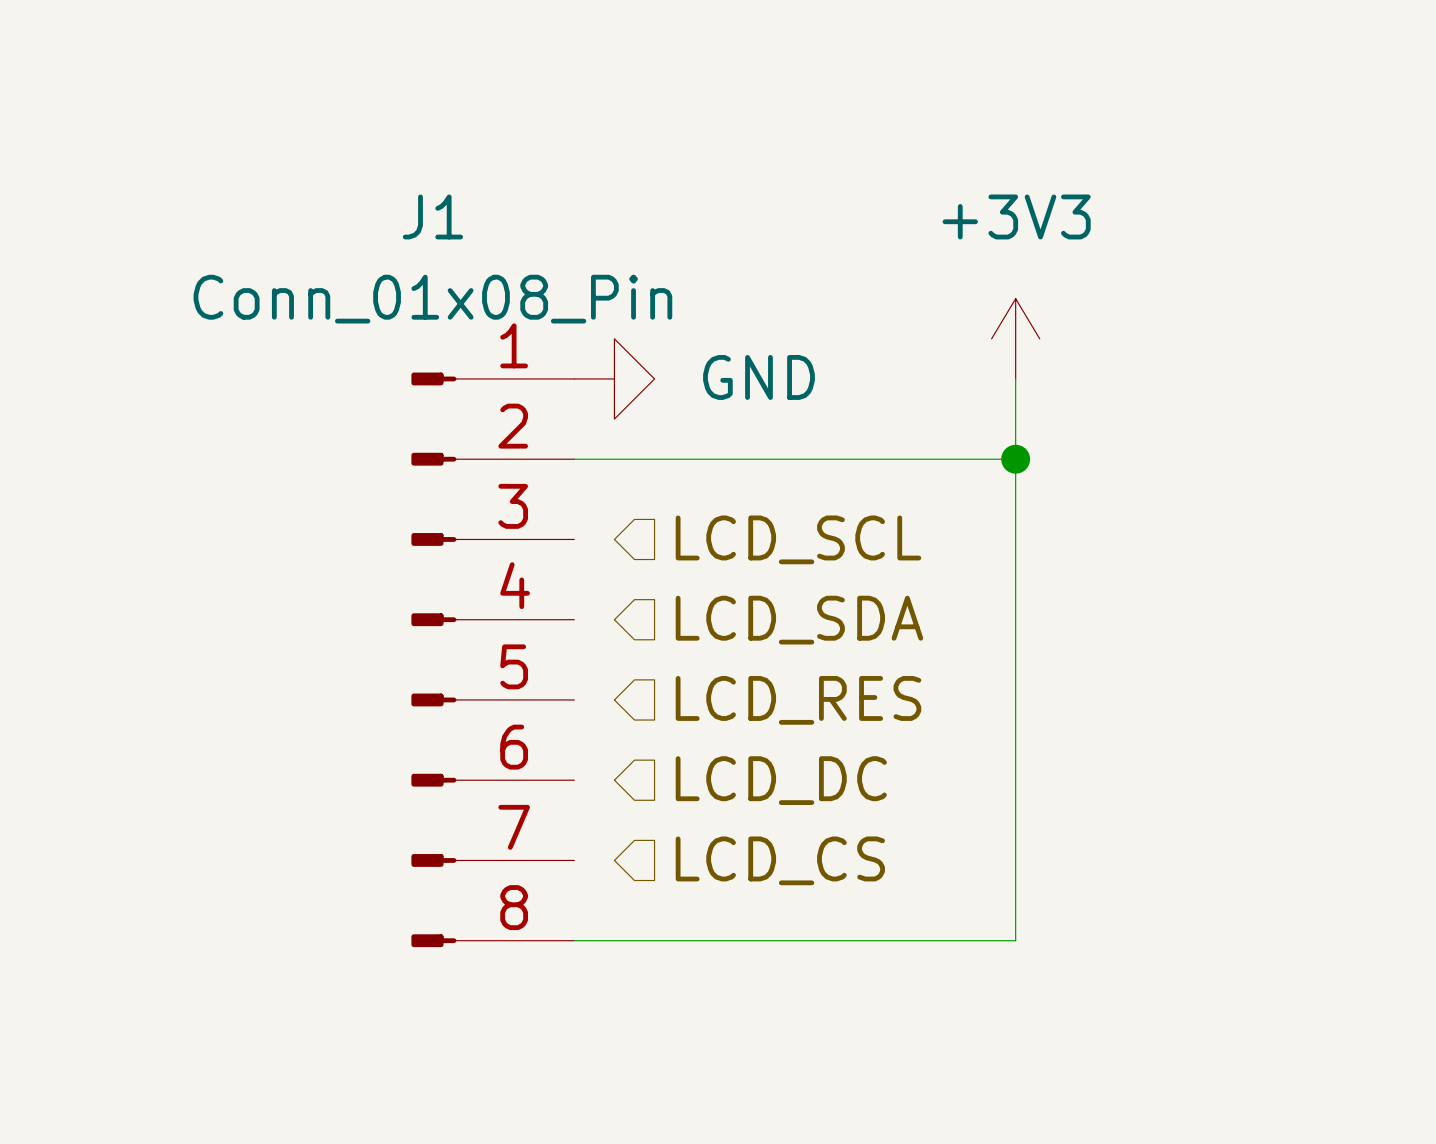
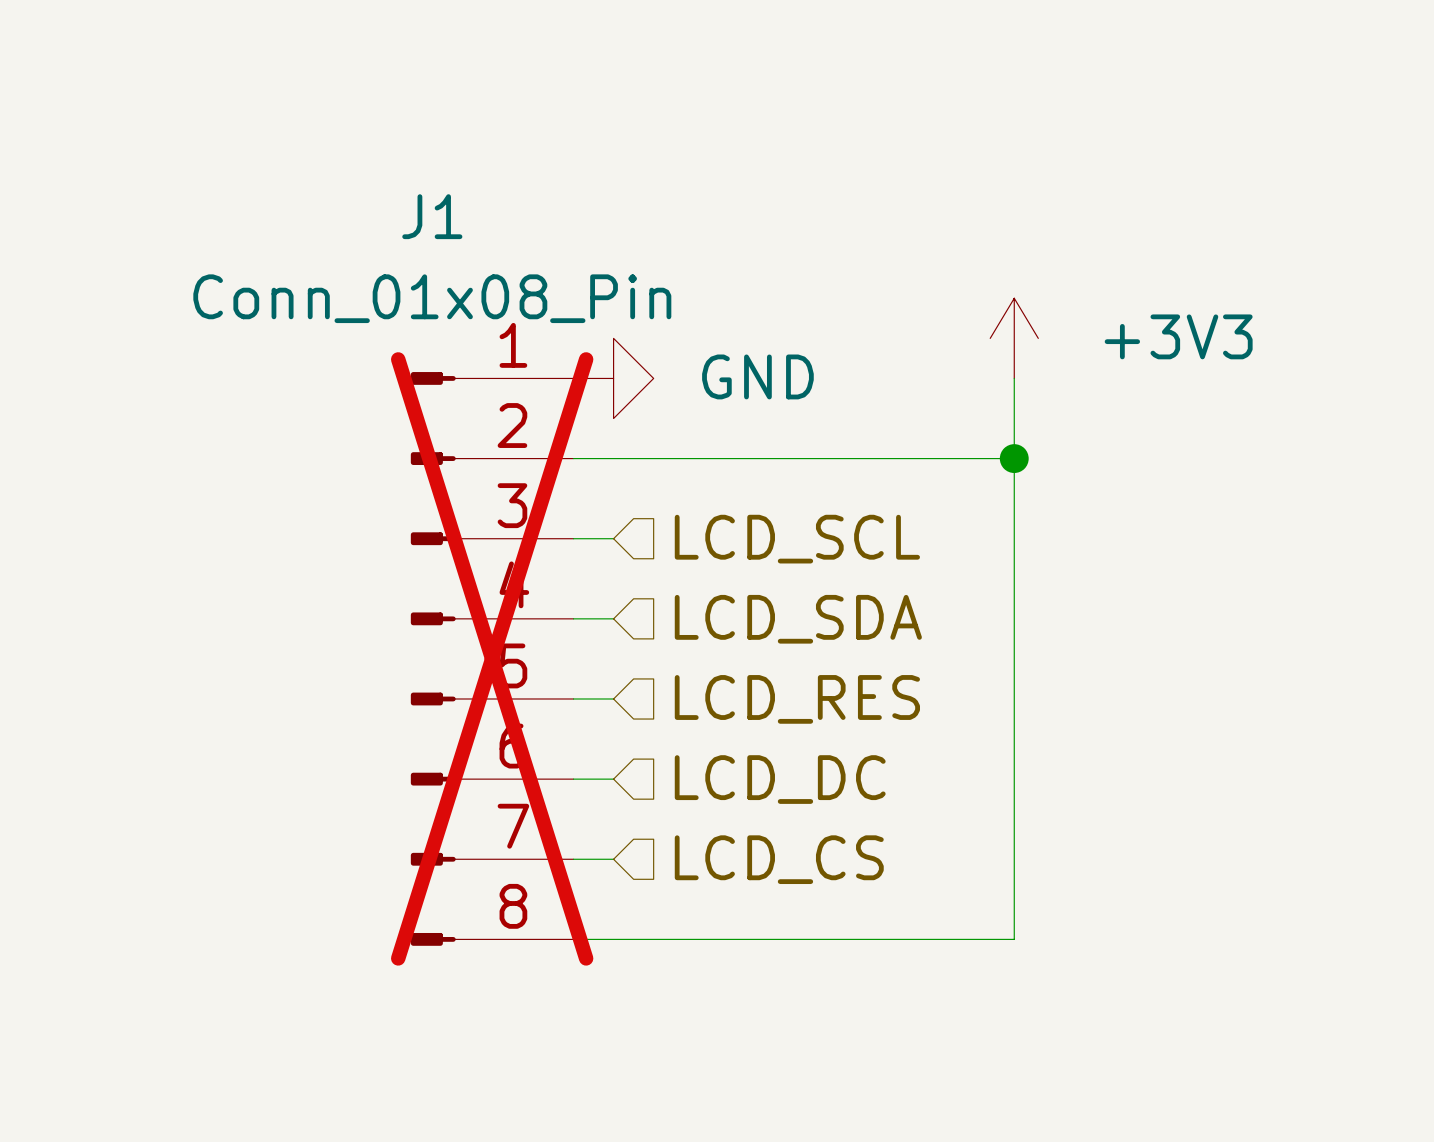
power symbol text position: +3V3 (1016, 216) -> +3V3 (1178, 336)
wire: none -> (573, 538) (613, 538)
wire: none -> (573, 618) (613, 618)
J1 do-not-place cross: none -> (492, 658)
wire: none -> (573, 698) (613, 698)
wire: none -> (573, 779) (613, 779)
wire: none -> (573, 859) (613, 859)

